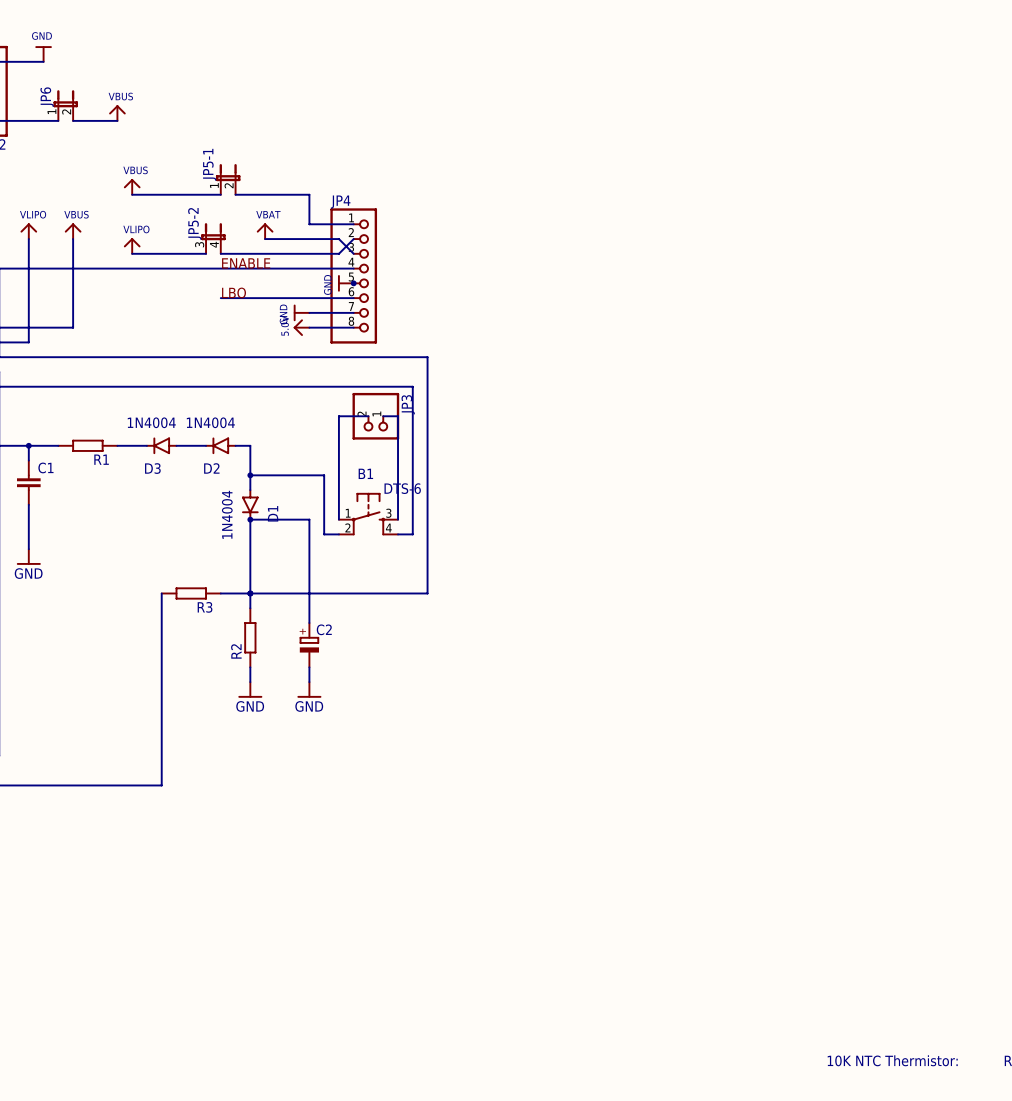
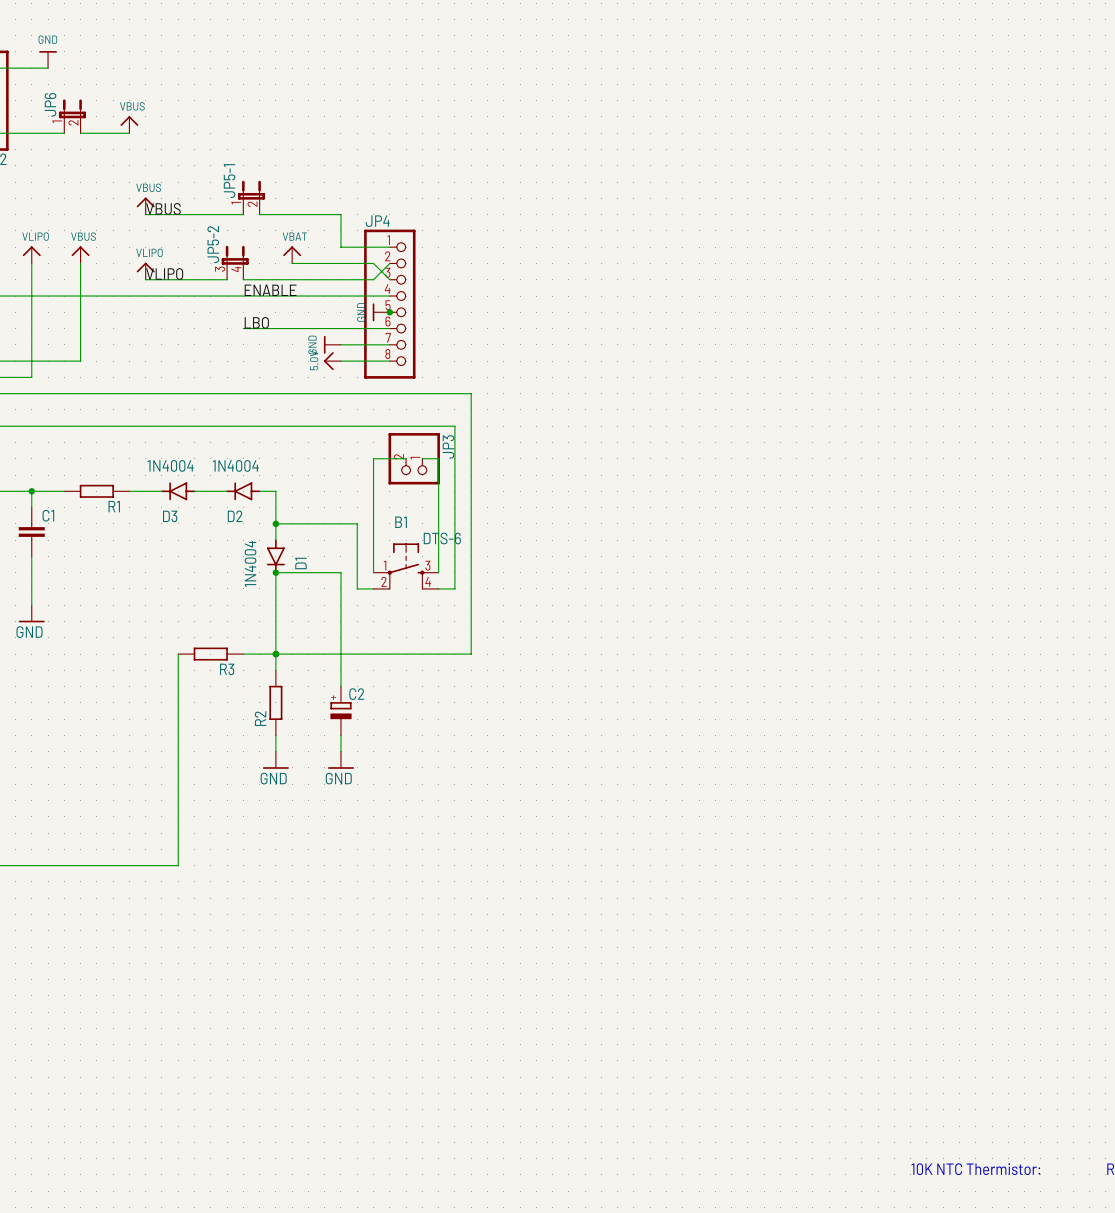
label: none -> VBUS (163, 208)
label: none -> VLIPO (164, 274)

